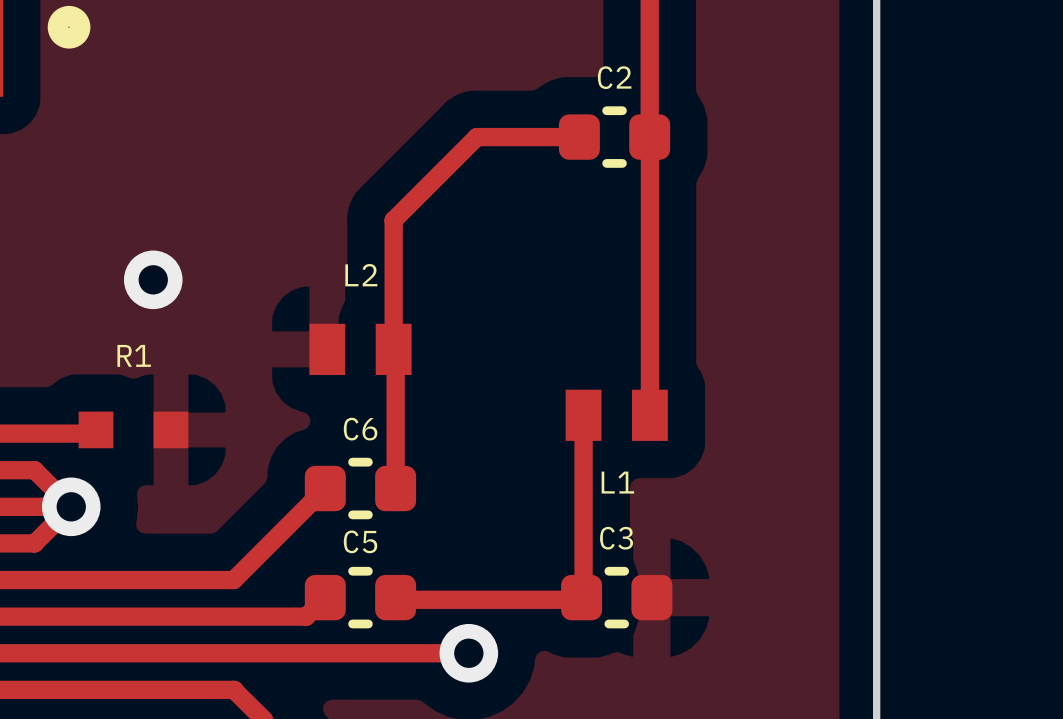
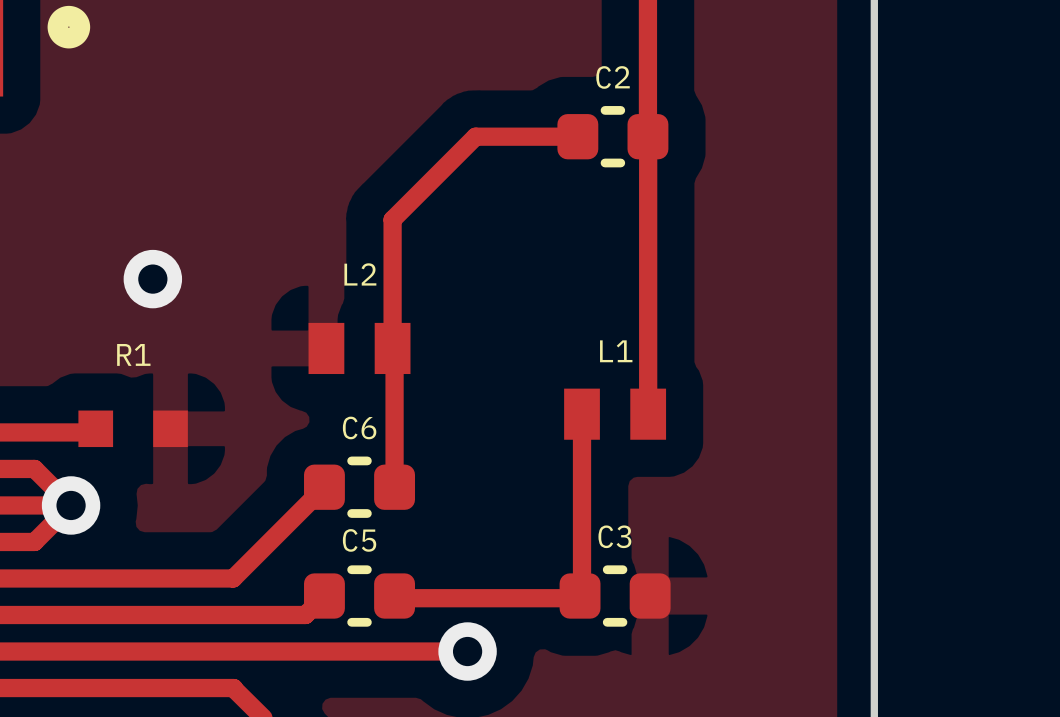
L1 name position: L1 (617, 482) -> L1 (616, 351)

